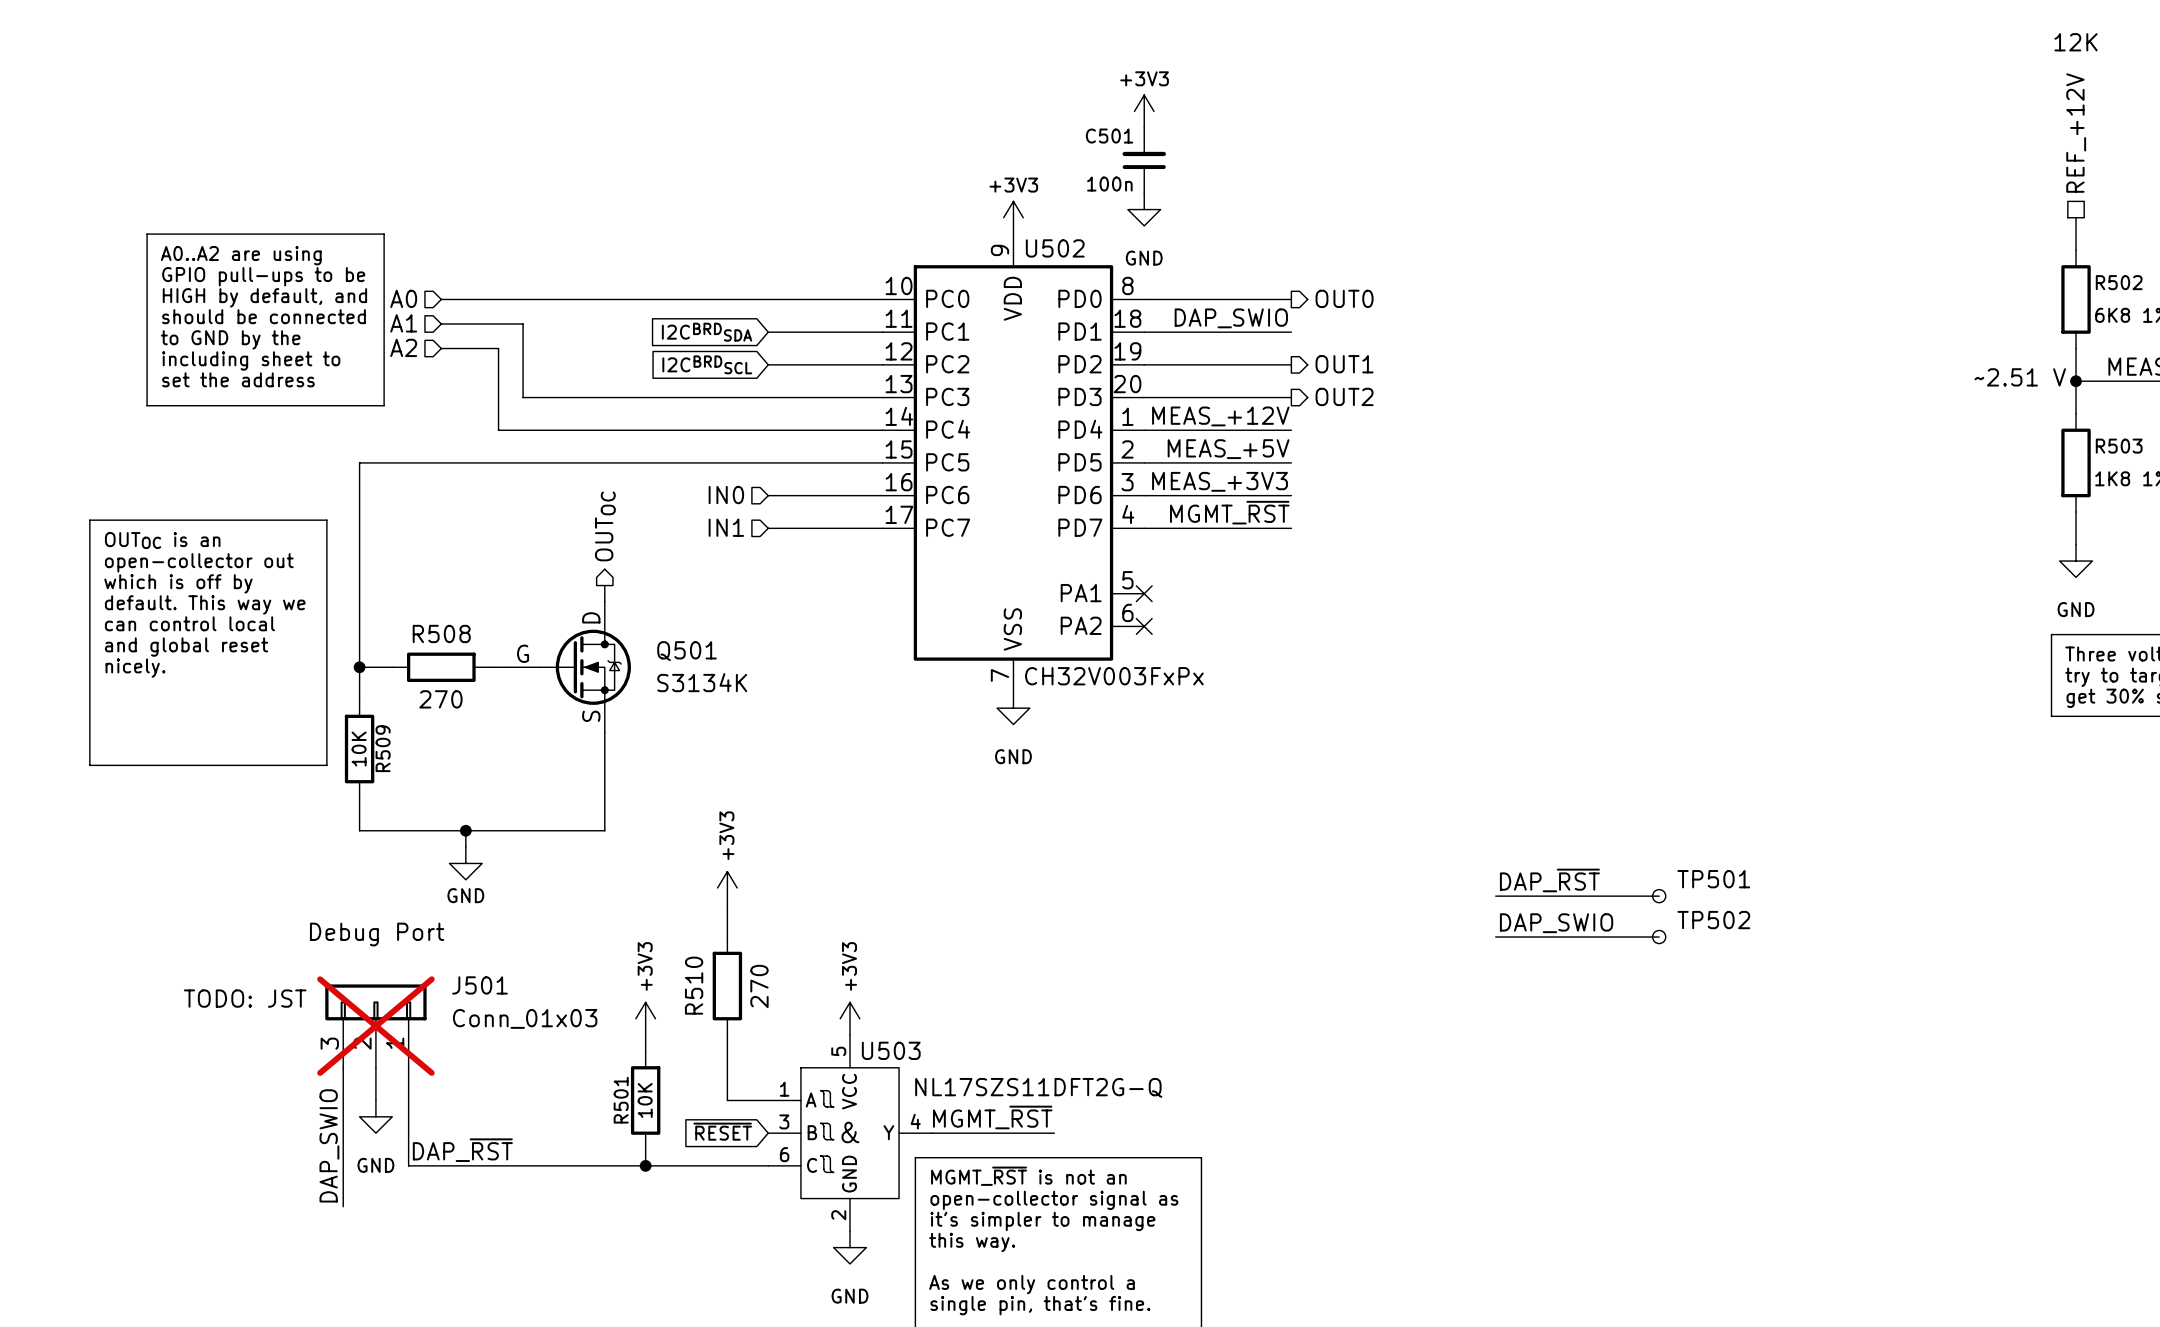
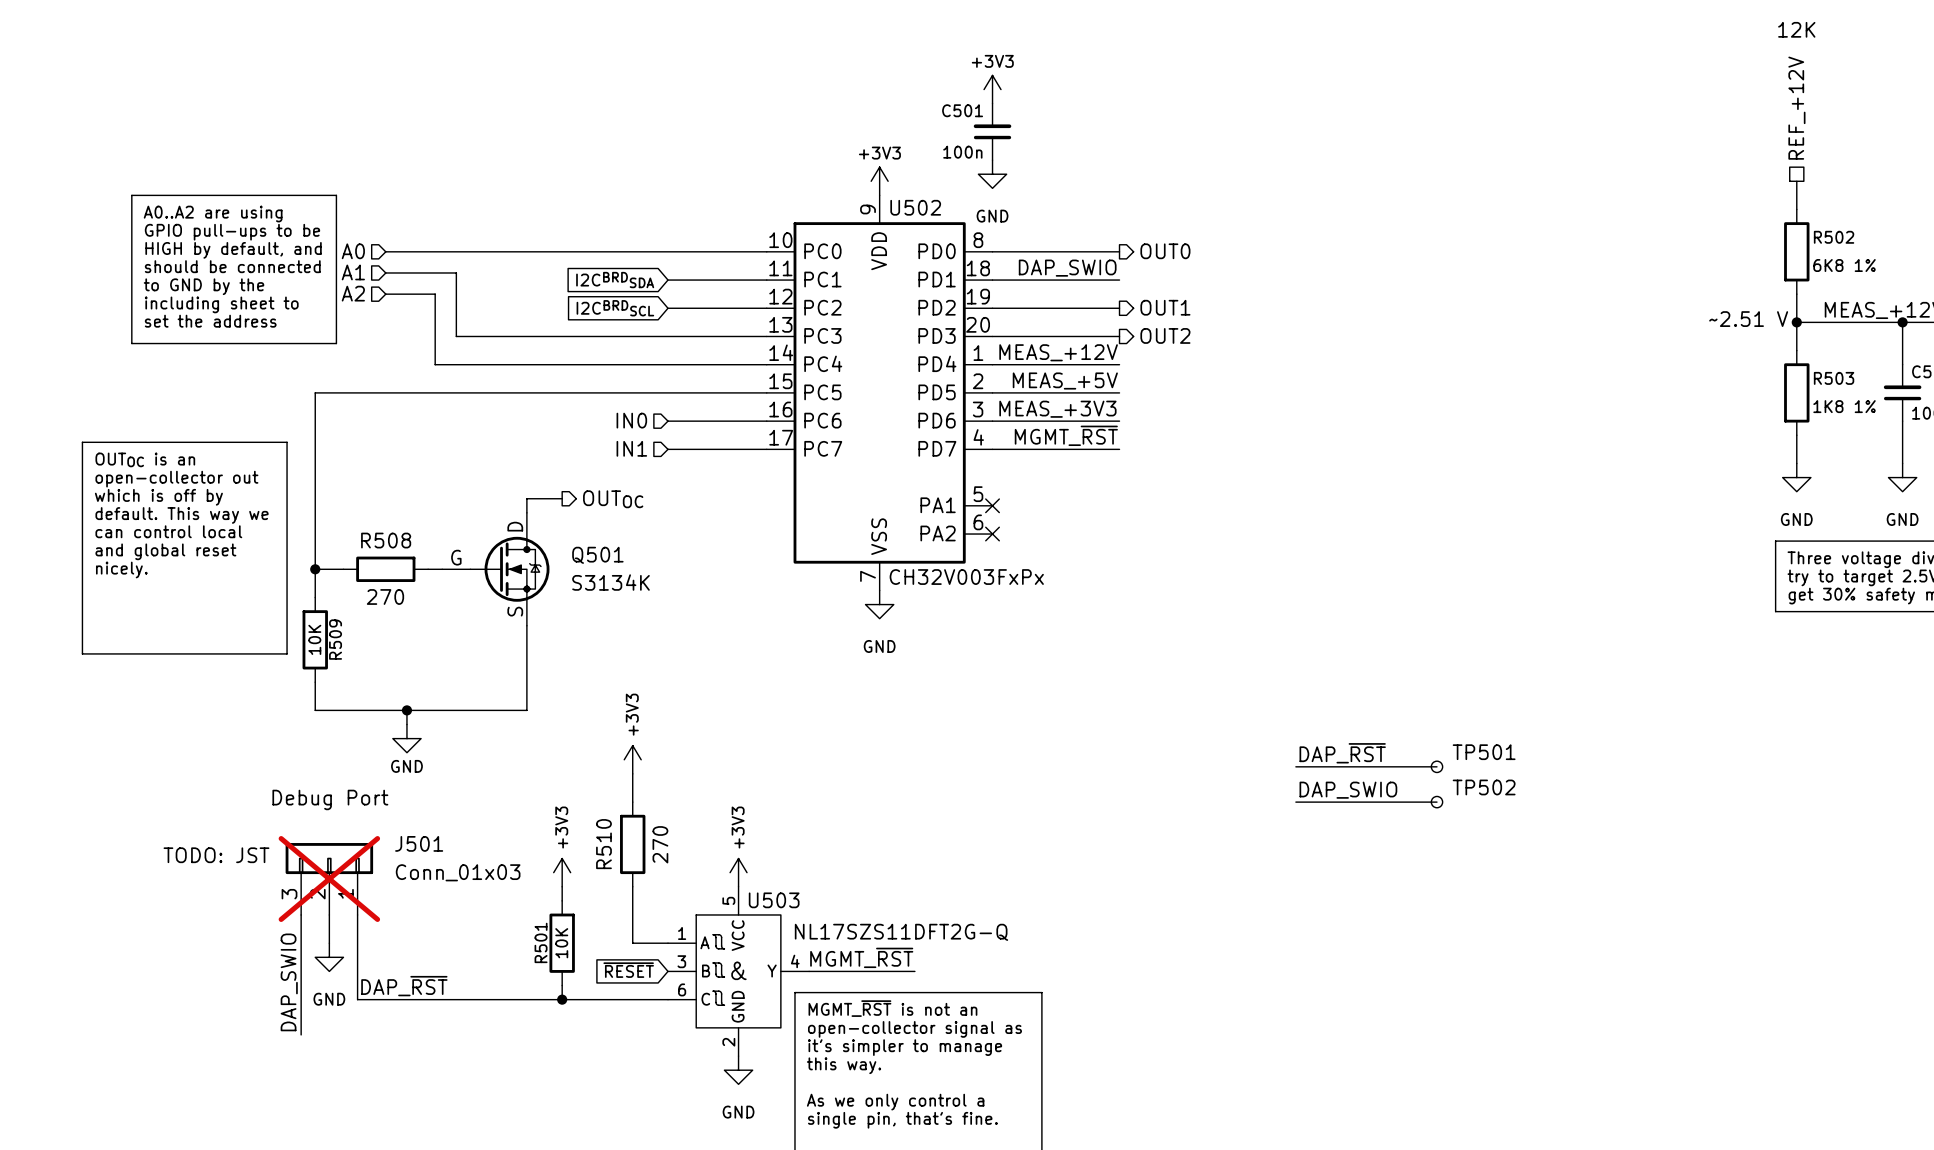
hierarchical label rotation: 0° (605, 526) -> 90° clockwise (613, 499)
hierarchical label position: OUTOC (605, 526) -> OUTOC (613, 499)
wire: none -> (526, 498) (562, 498)

